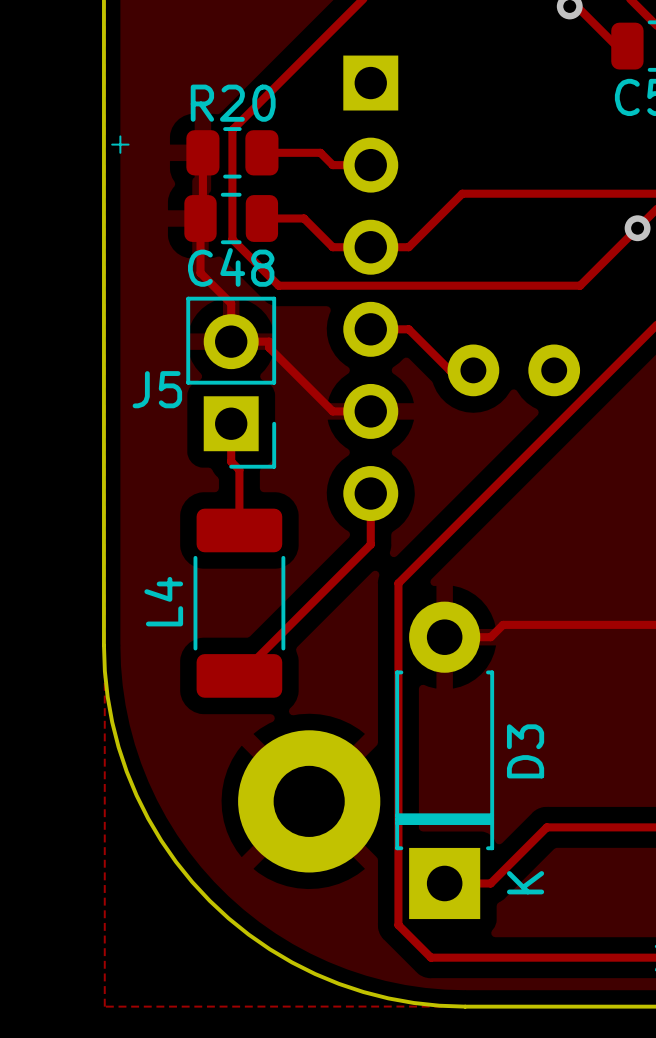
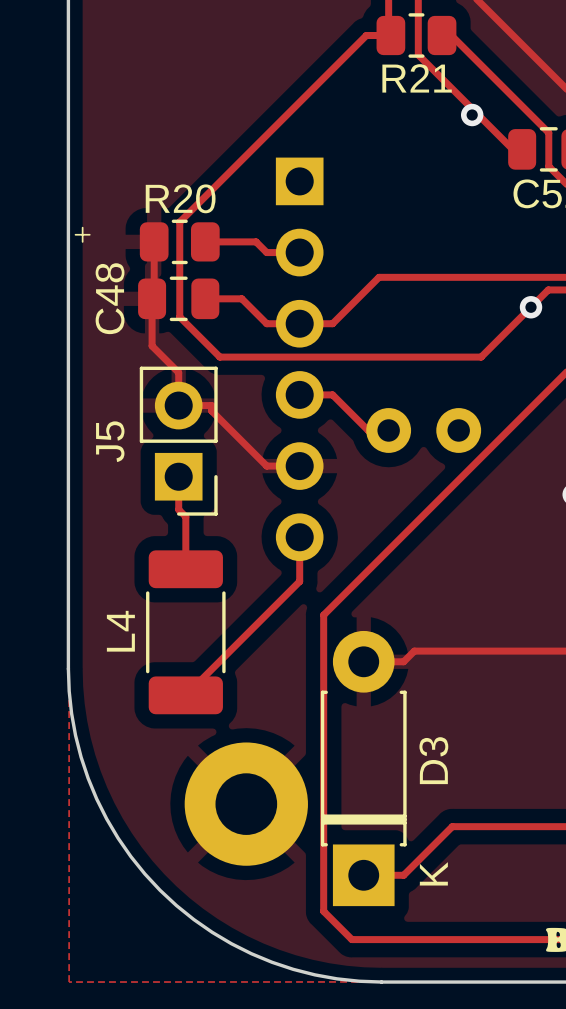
C48 name rotation: 0° (231, 267) -> 90° counterclockwise (110, 298)
J5 name rotation: 0° (157, 389) -> 90° counterclockwise (110, 441)

